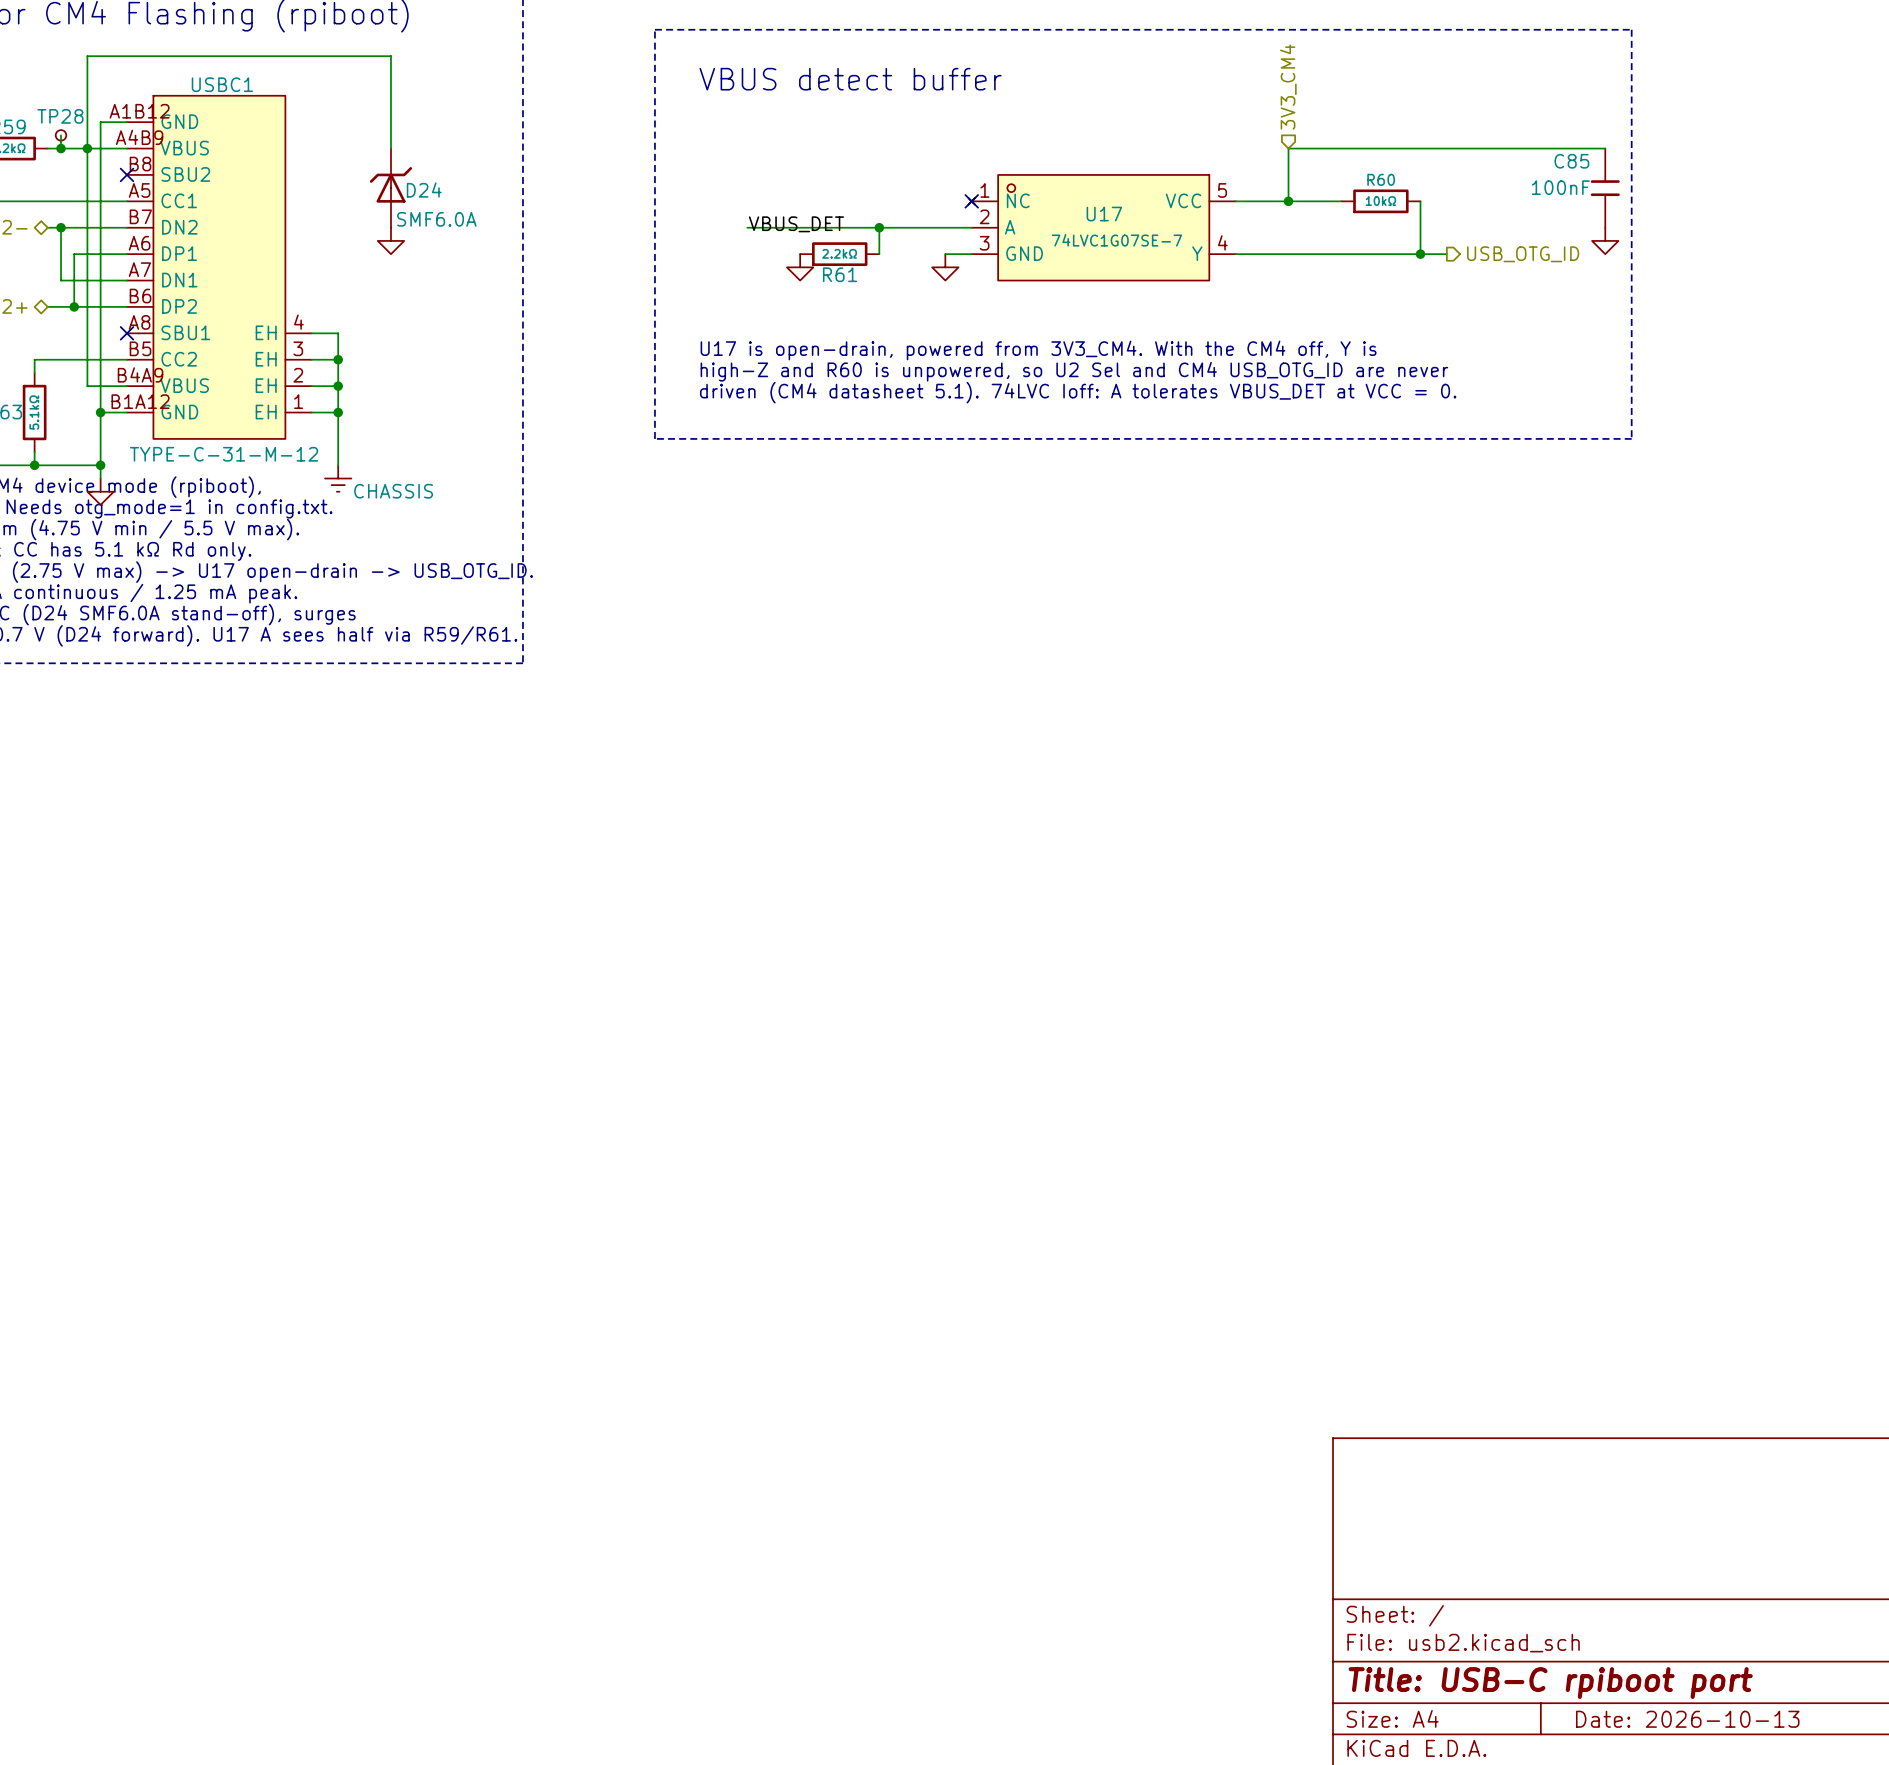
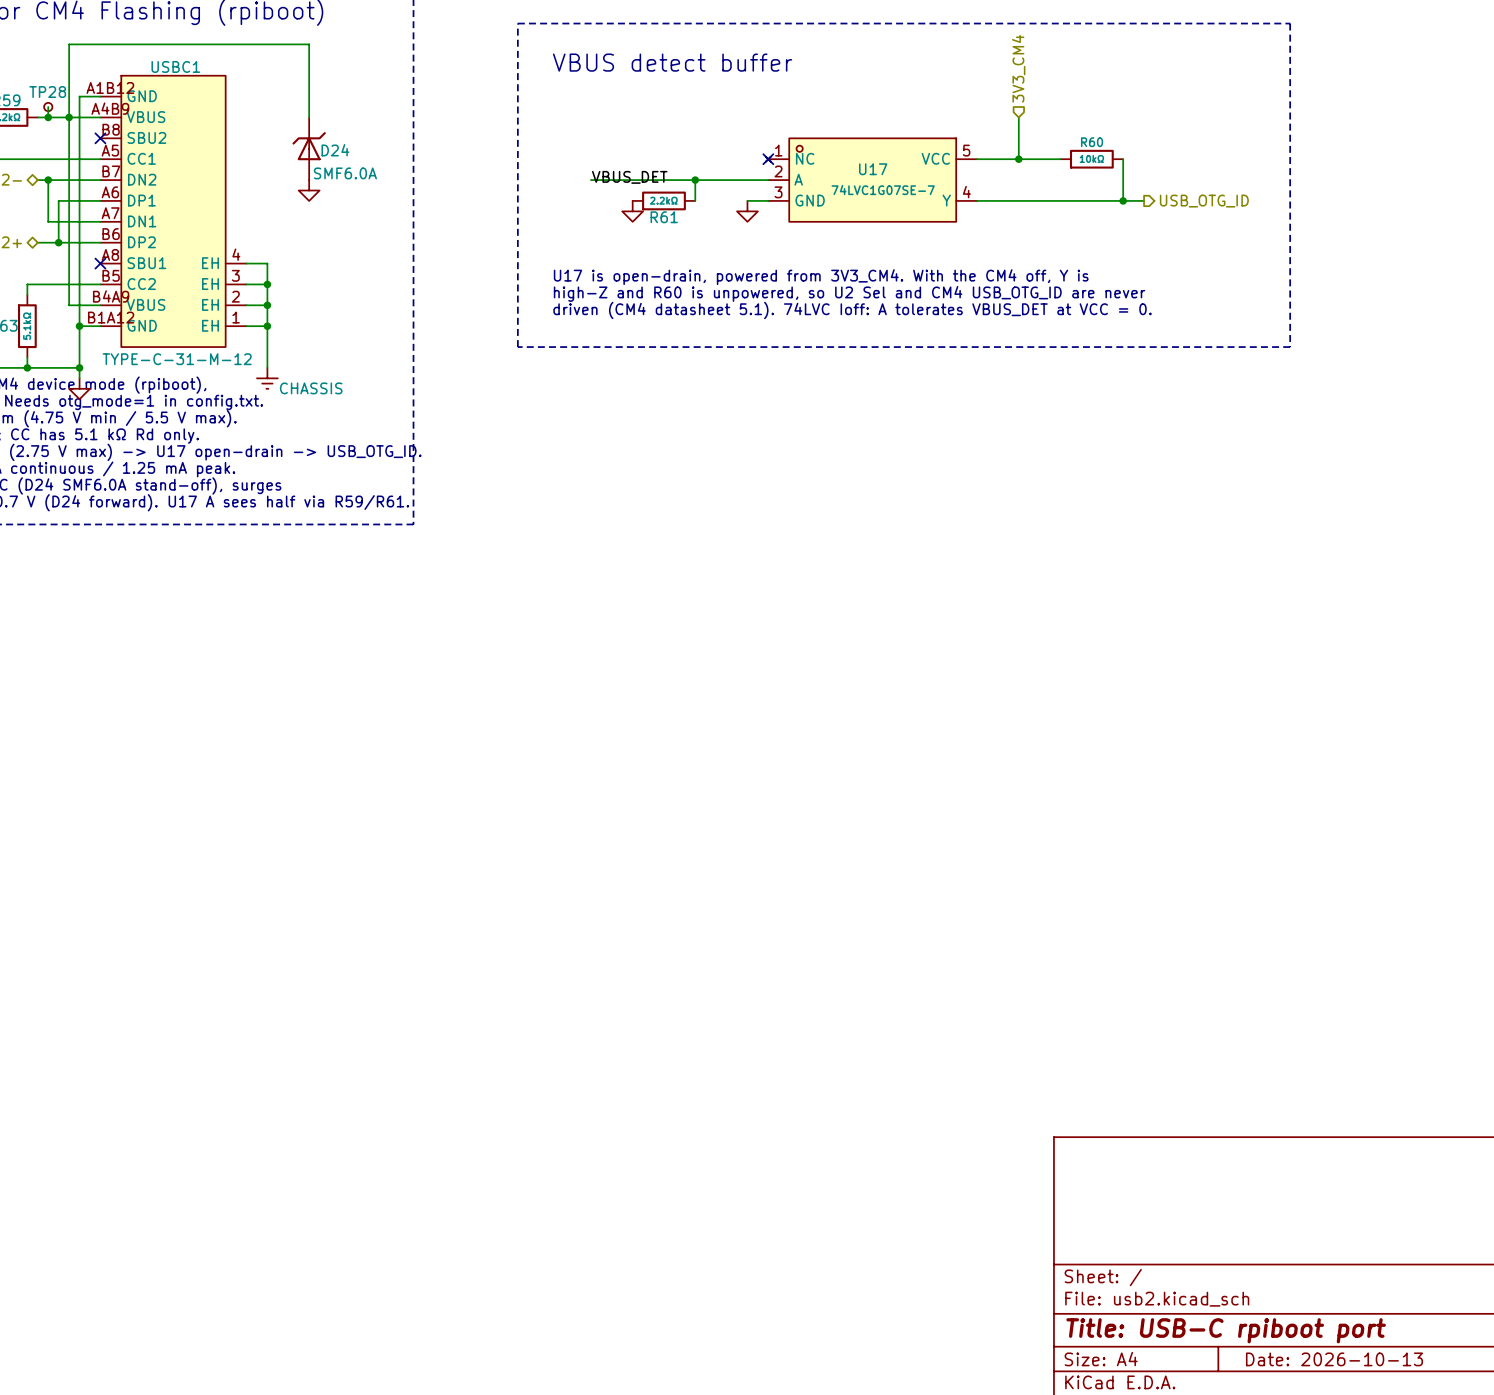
wire: (1288, 148) (1605, 148) -> none
C85: 100nF (1605, 188) -> none
power symbol: (1605, 240) -> none

